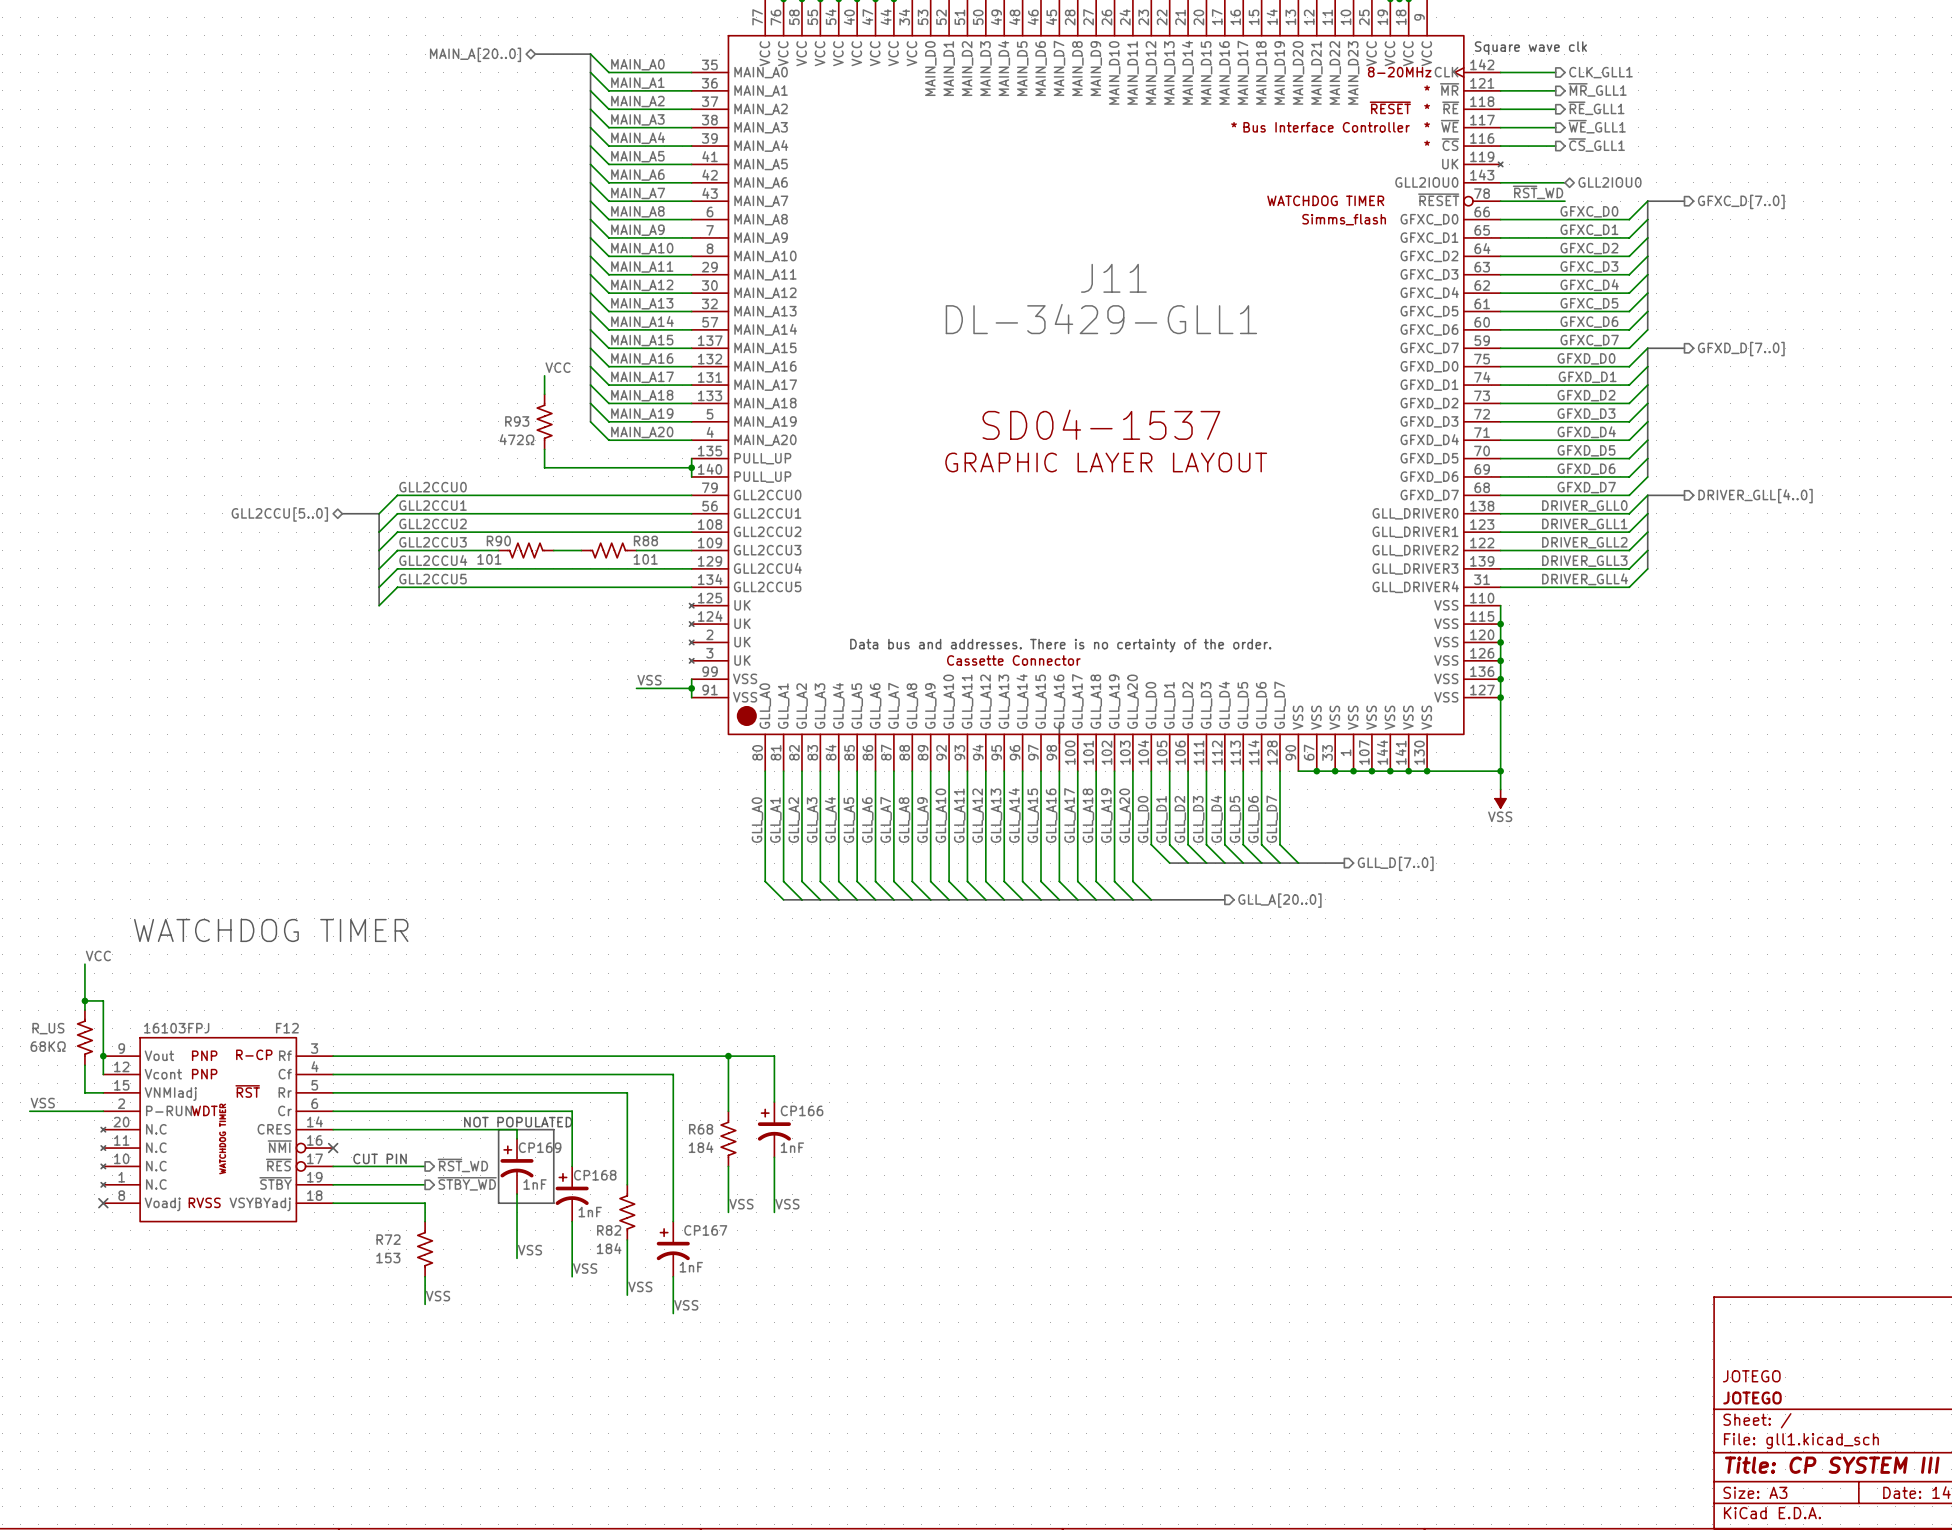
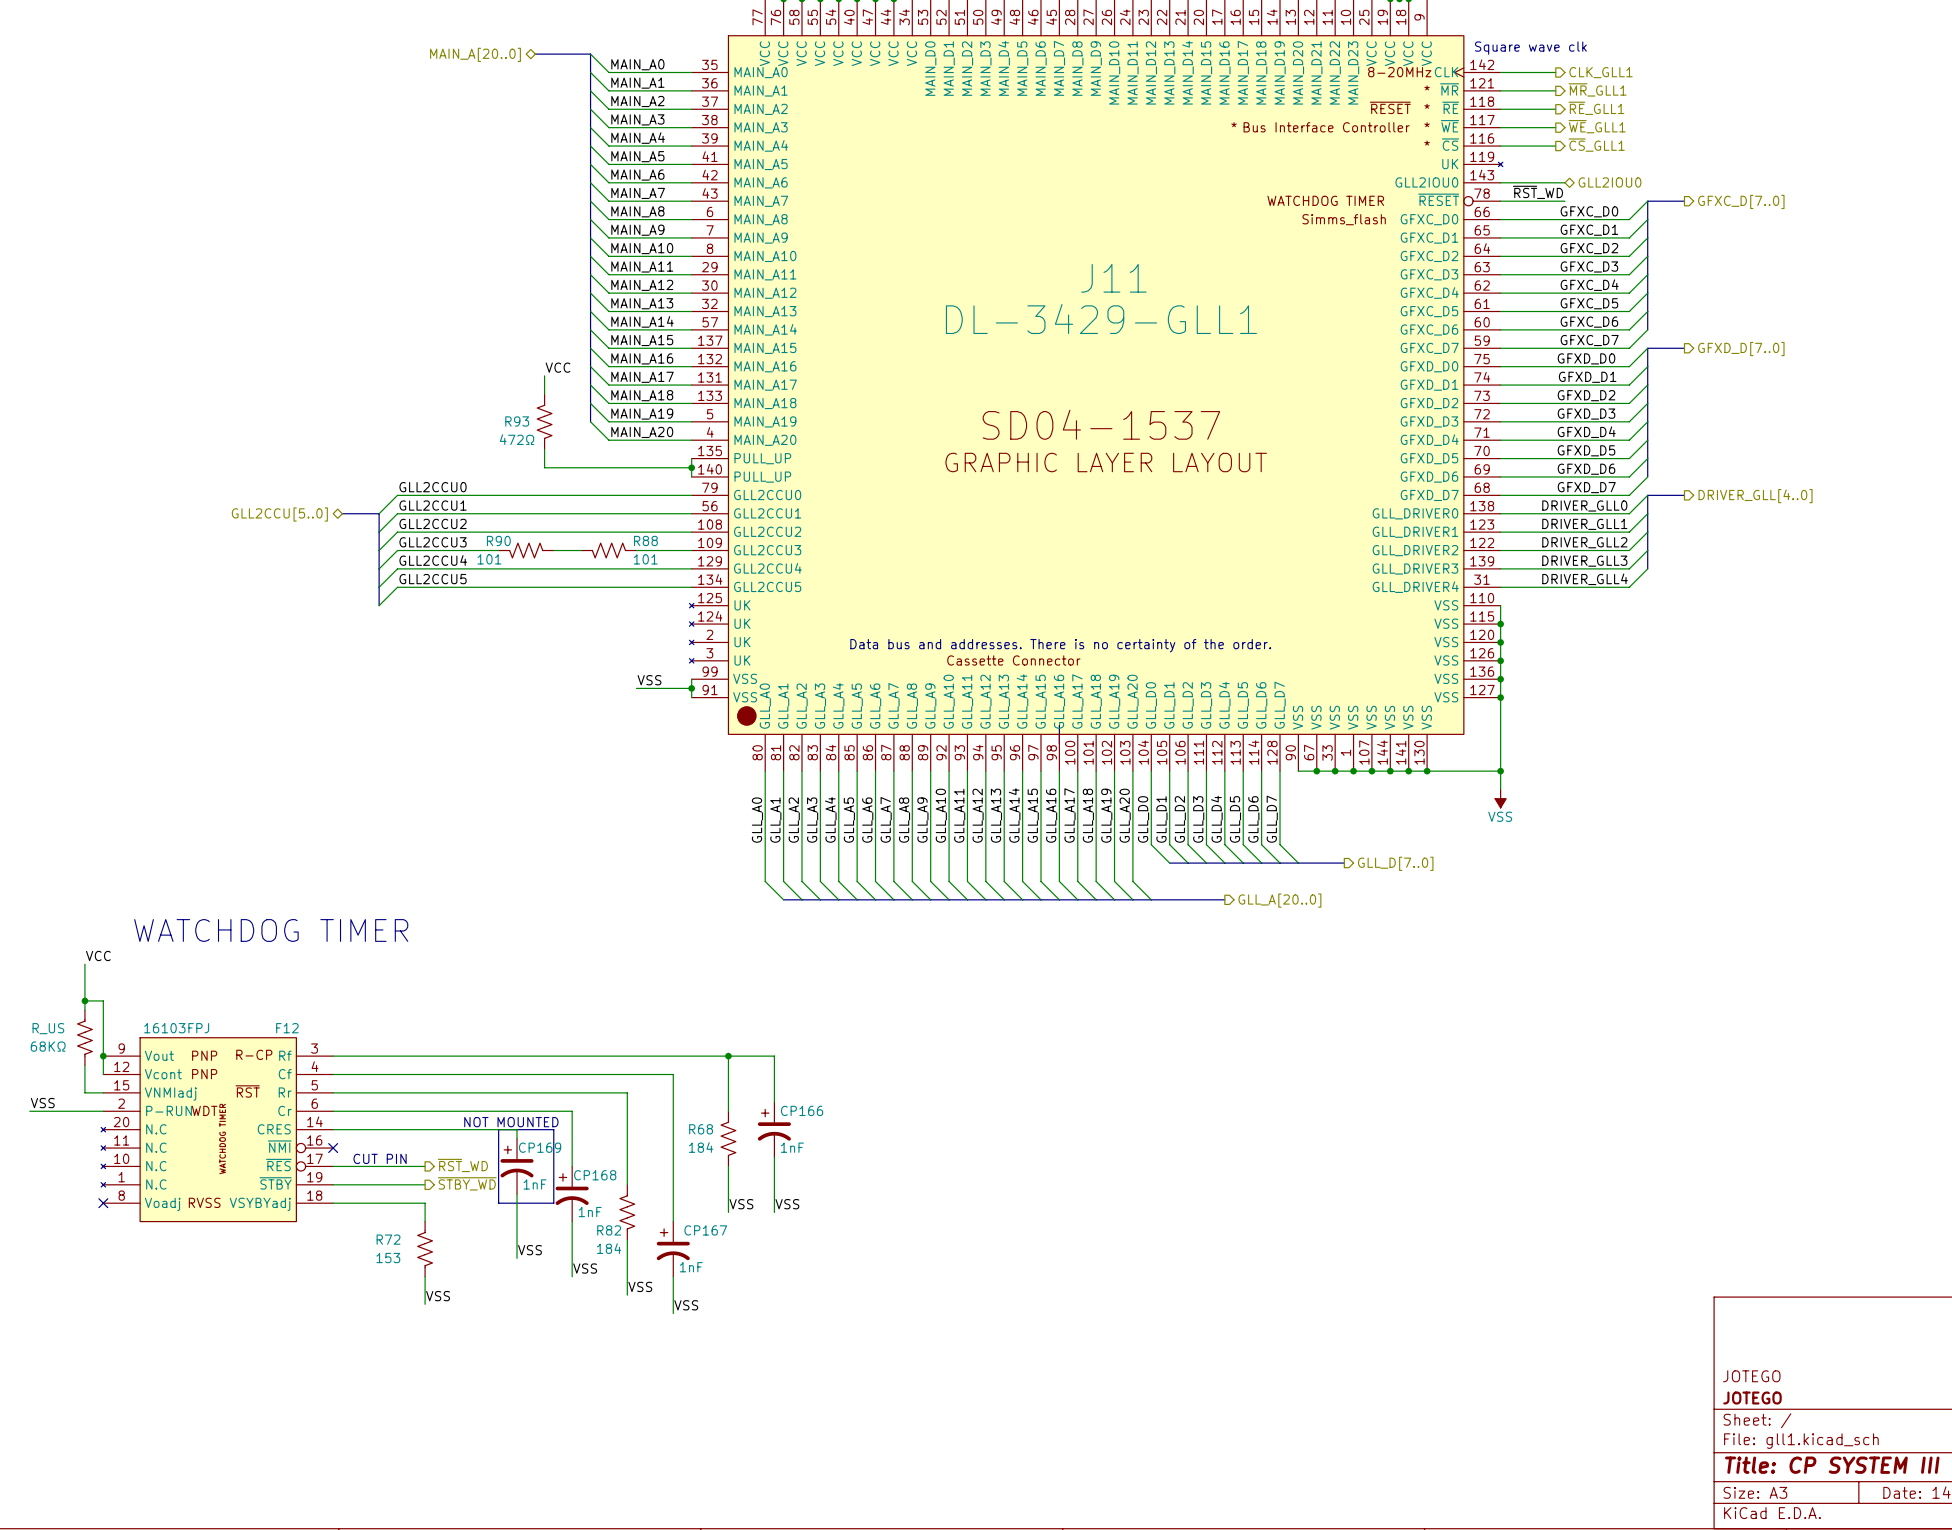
text: NOT POPULATED (518, 1122) -> NOT MOUNTED (511, 1122)

